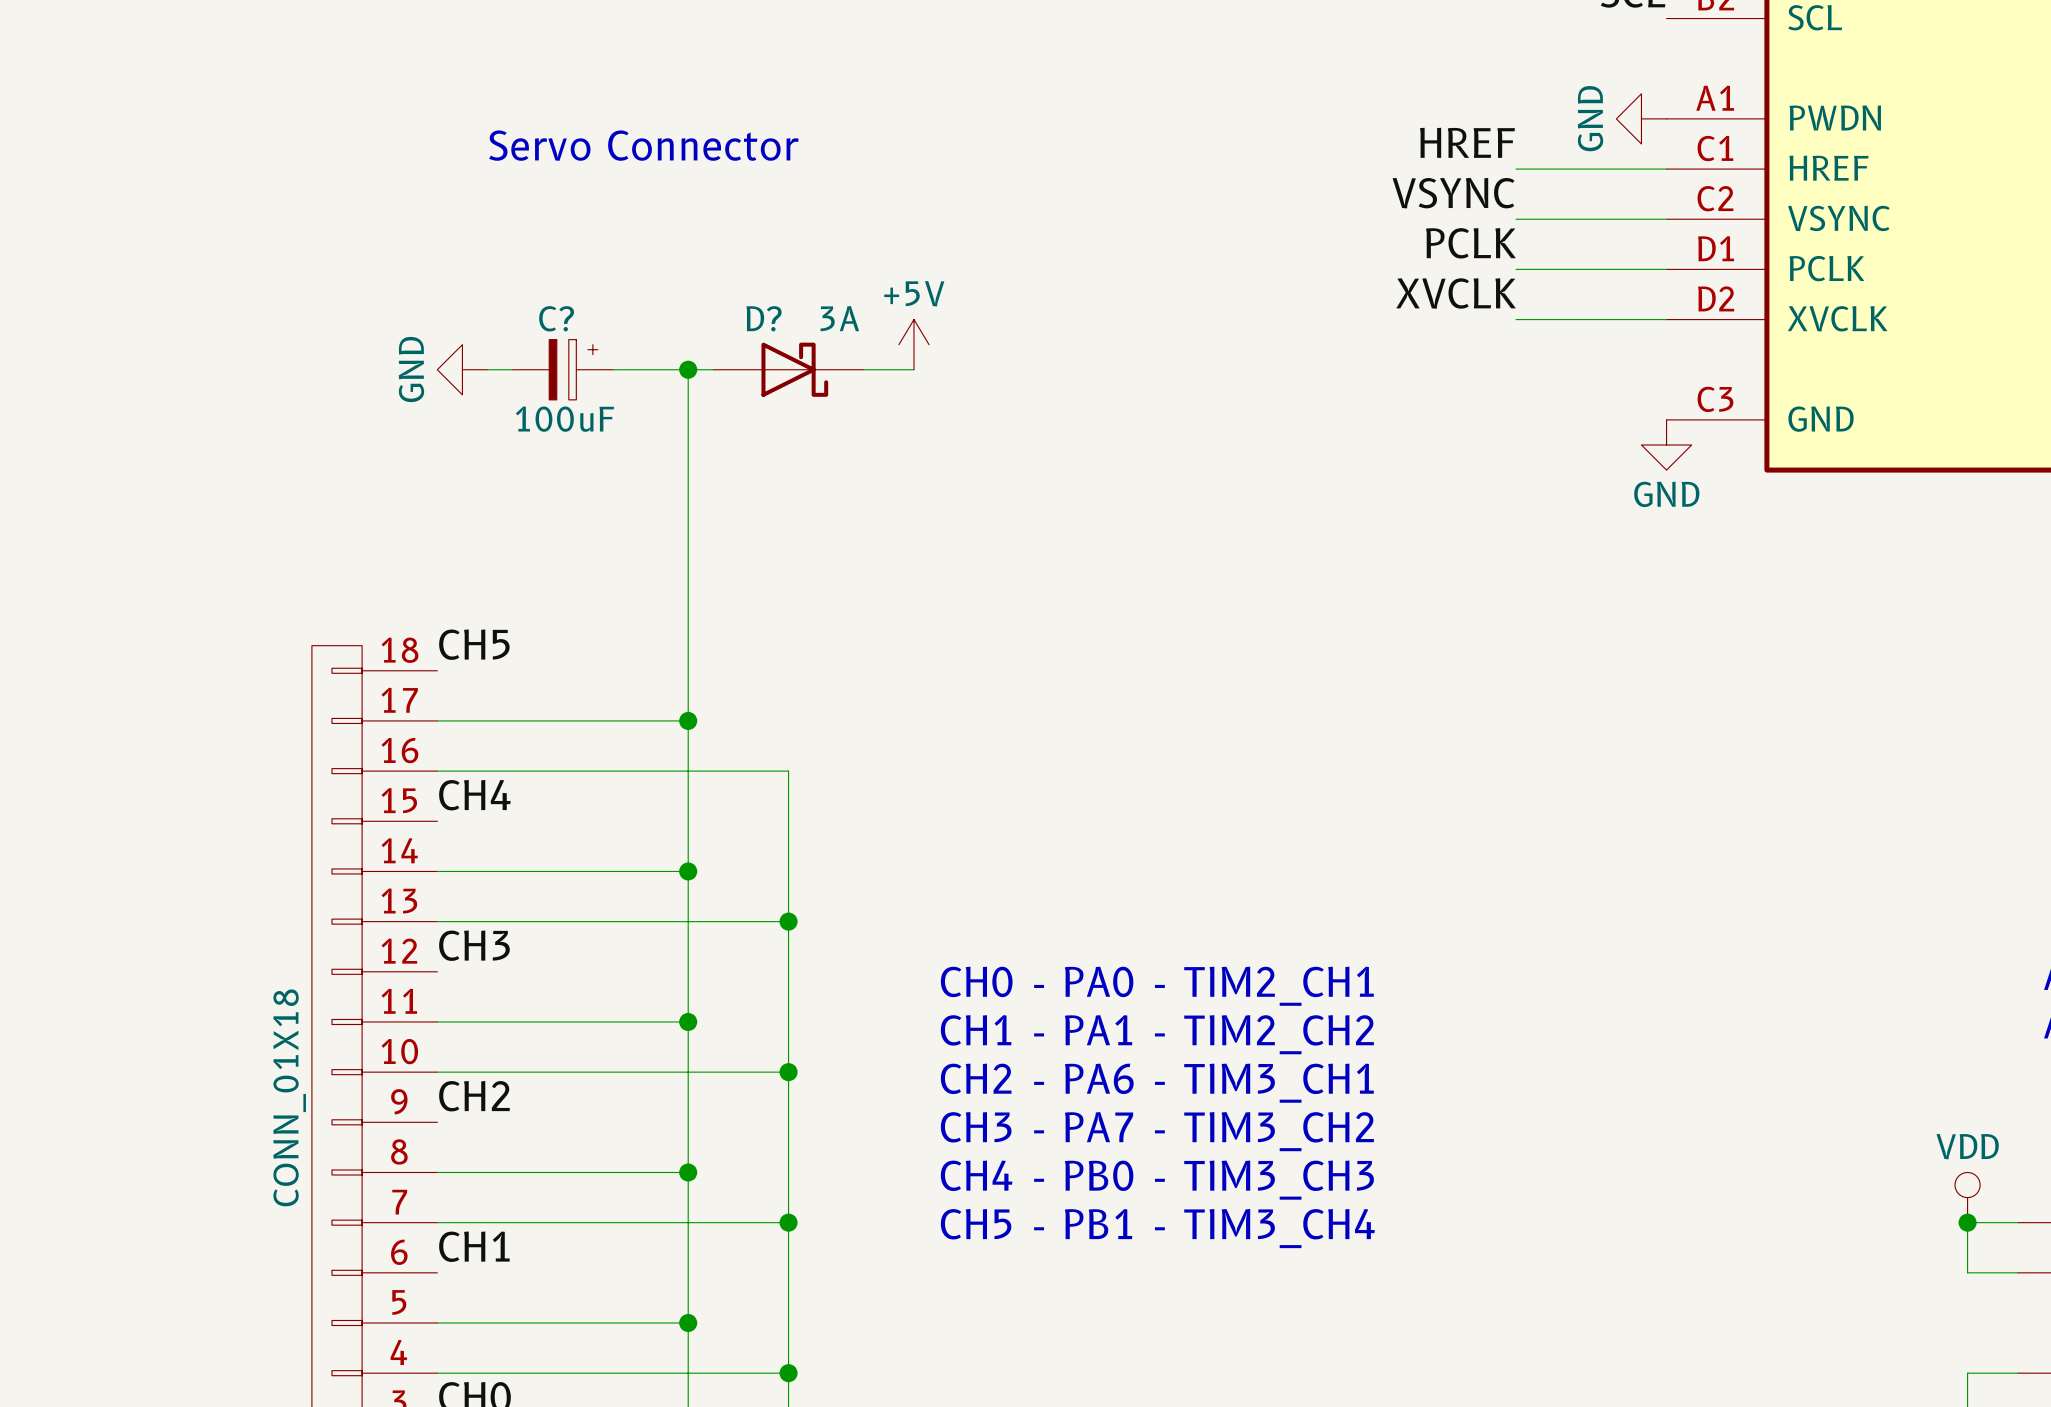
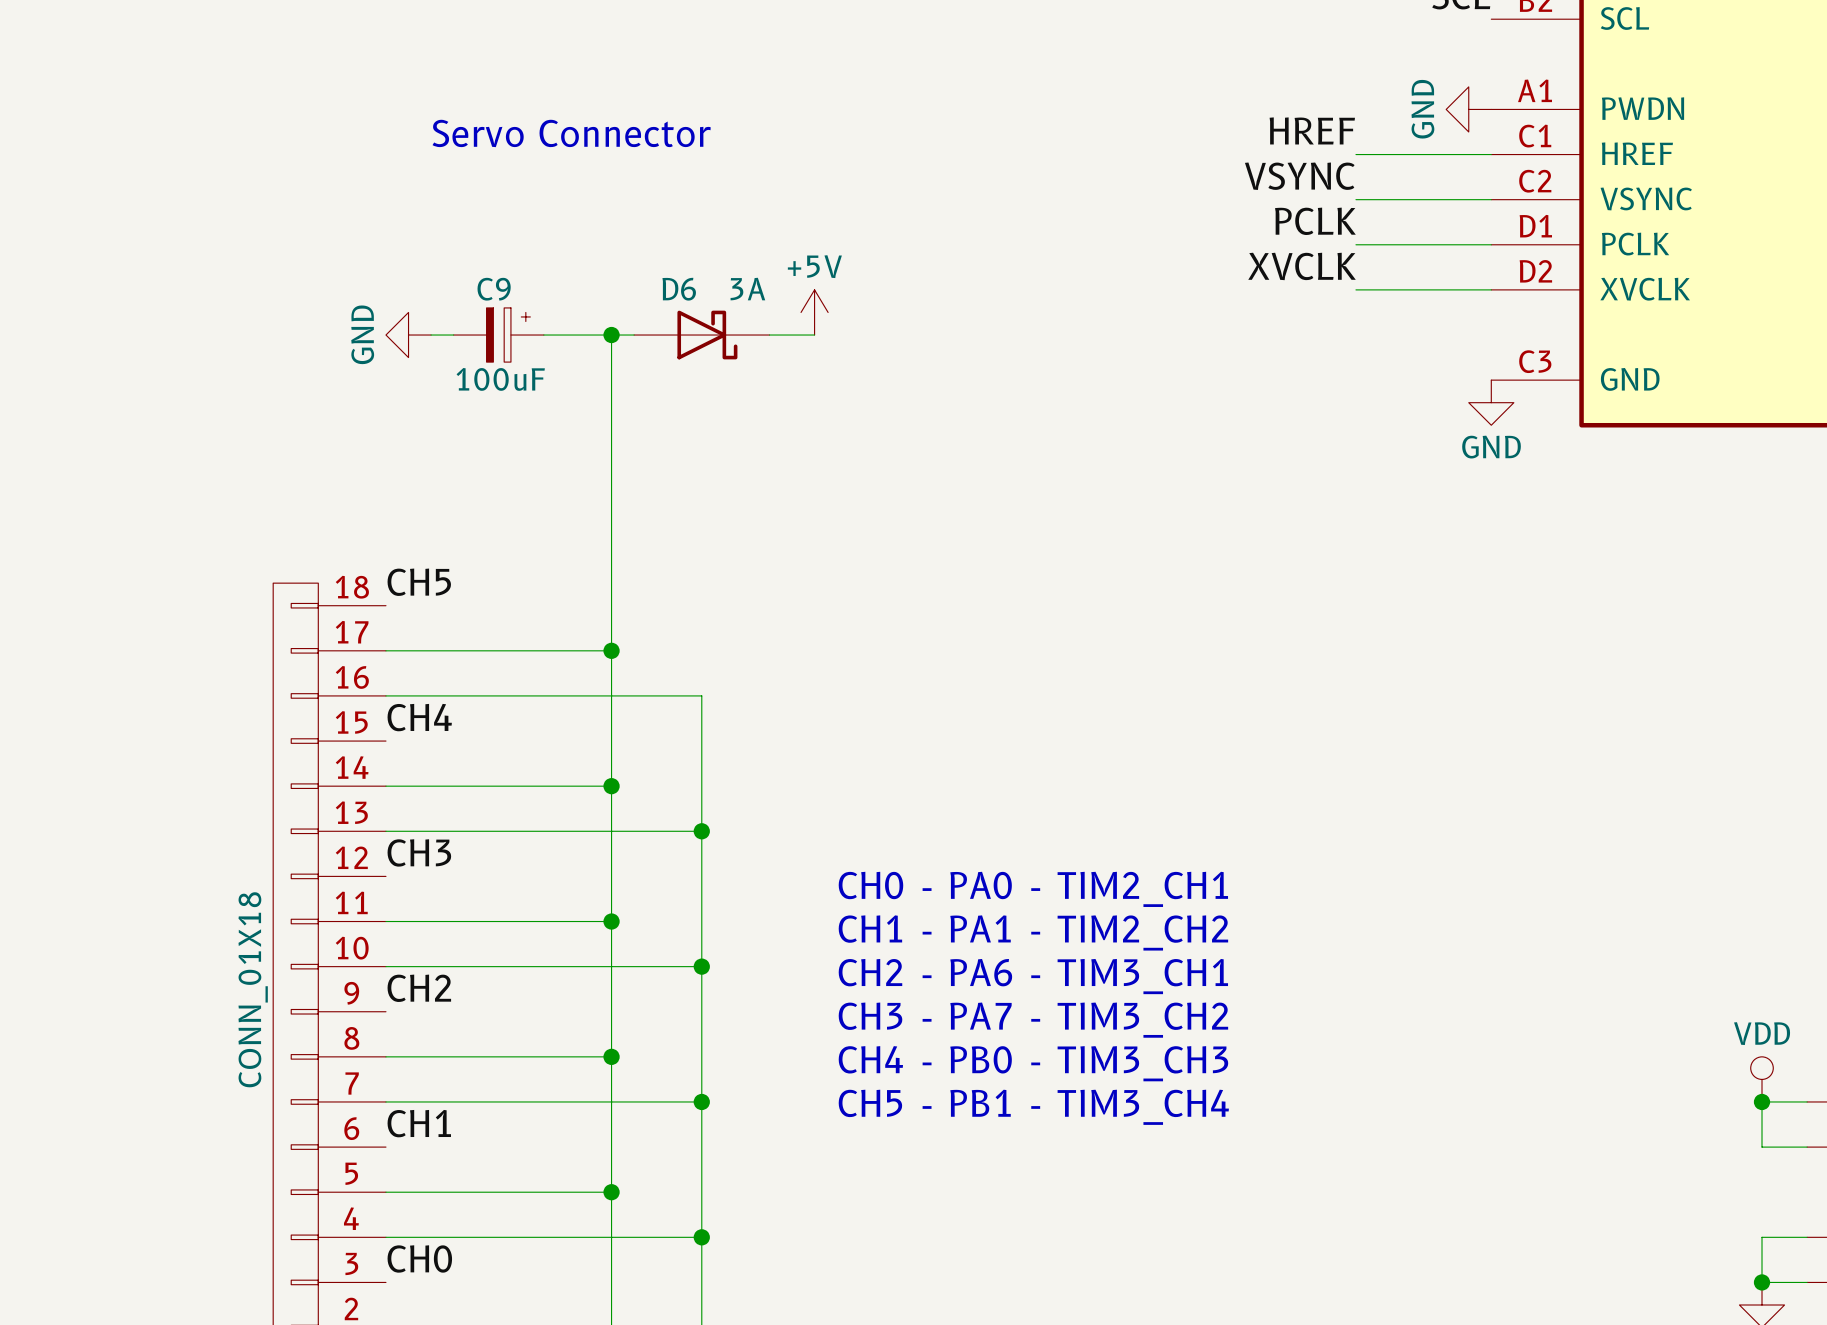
C? name: C? (556, 318) -> C9 (494, 289)
D? name: D? (764, 318) -> D6 (679, 289)

